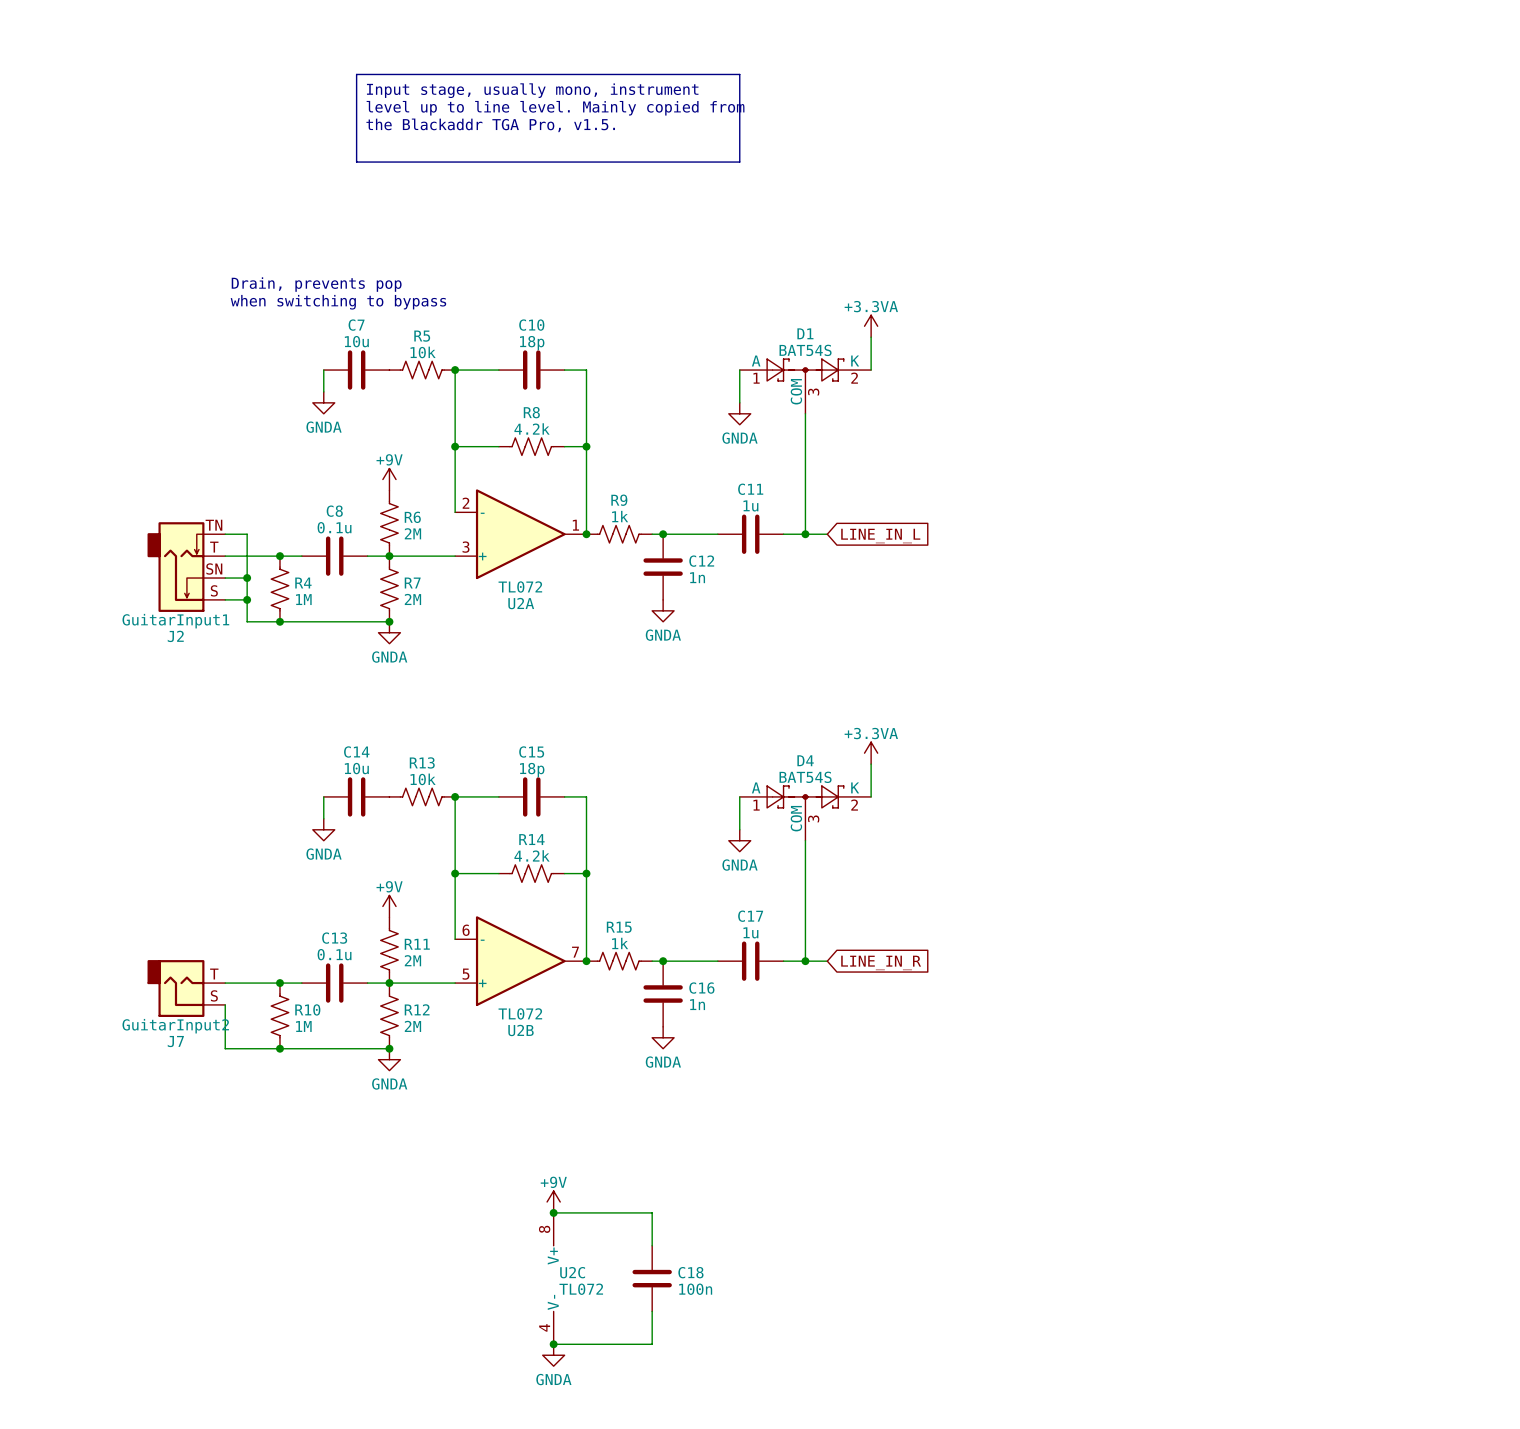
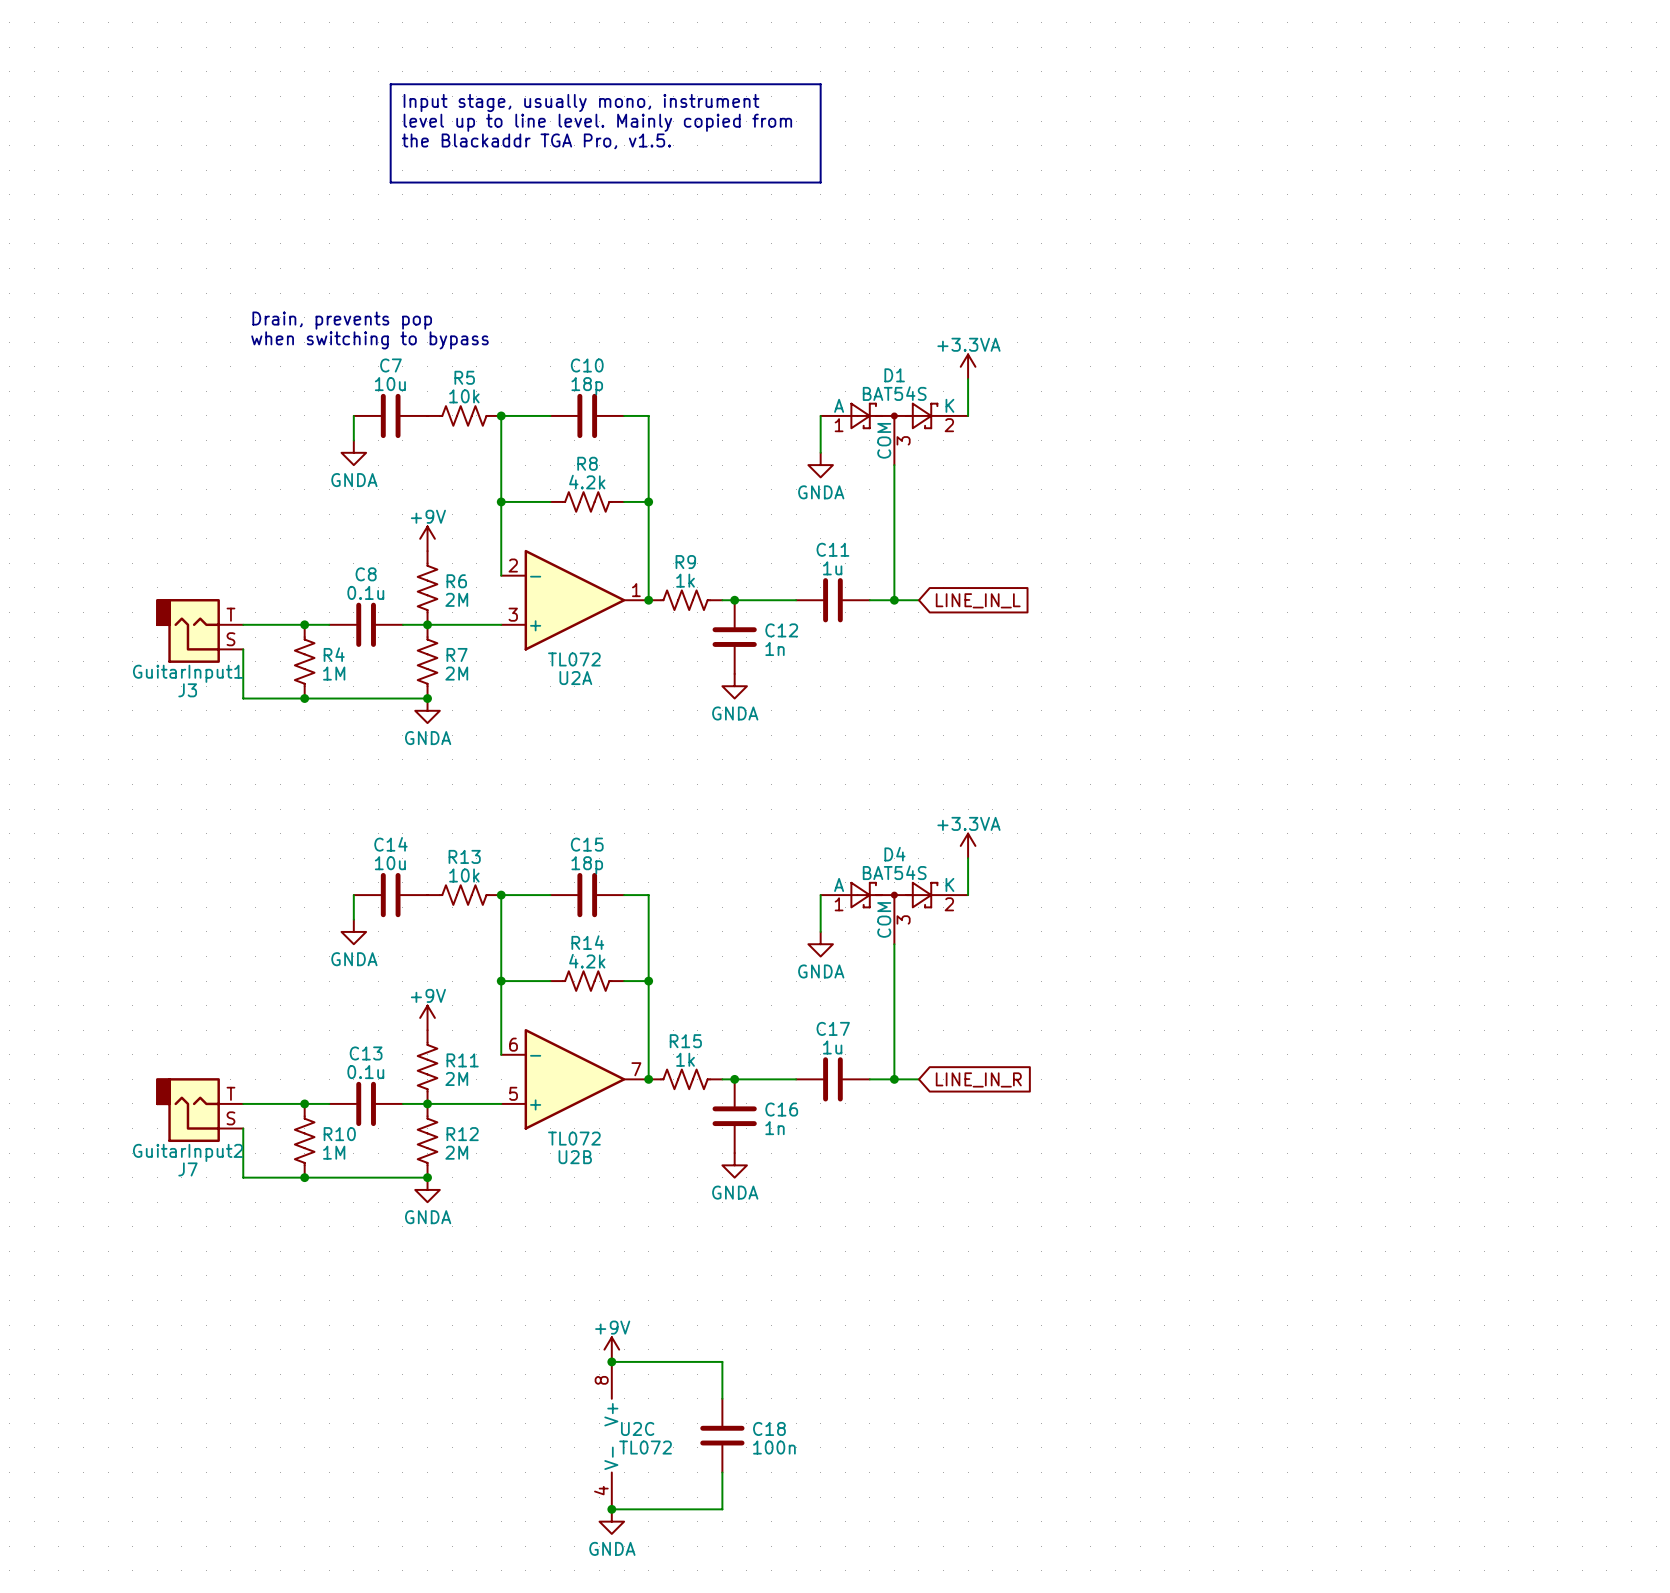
wire: (225, 534) (247, 534) (247, 621) -> (243, 649) (243, 698) (267, 698)
J3: none -> GuitarInput1 (199, 630)
J2: GuitarInput1 (186, 567) -> none
wire: (225, 578) (247, 578) -> none
junction: (247, 578) -> none
wire: (225, 599) (247, 599) -> none
junction: (247, 599) -> none

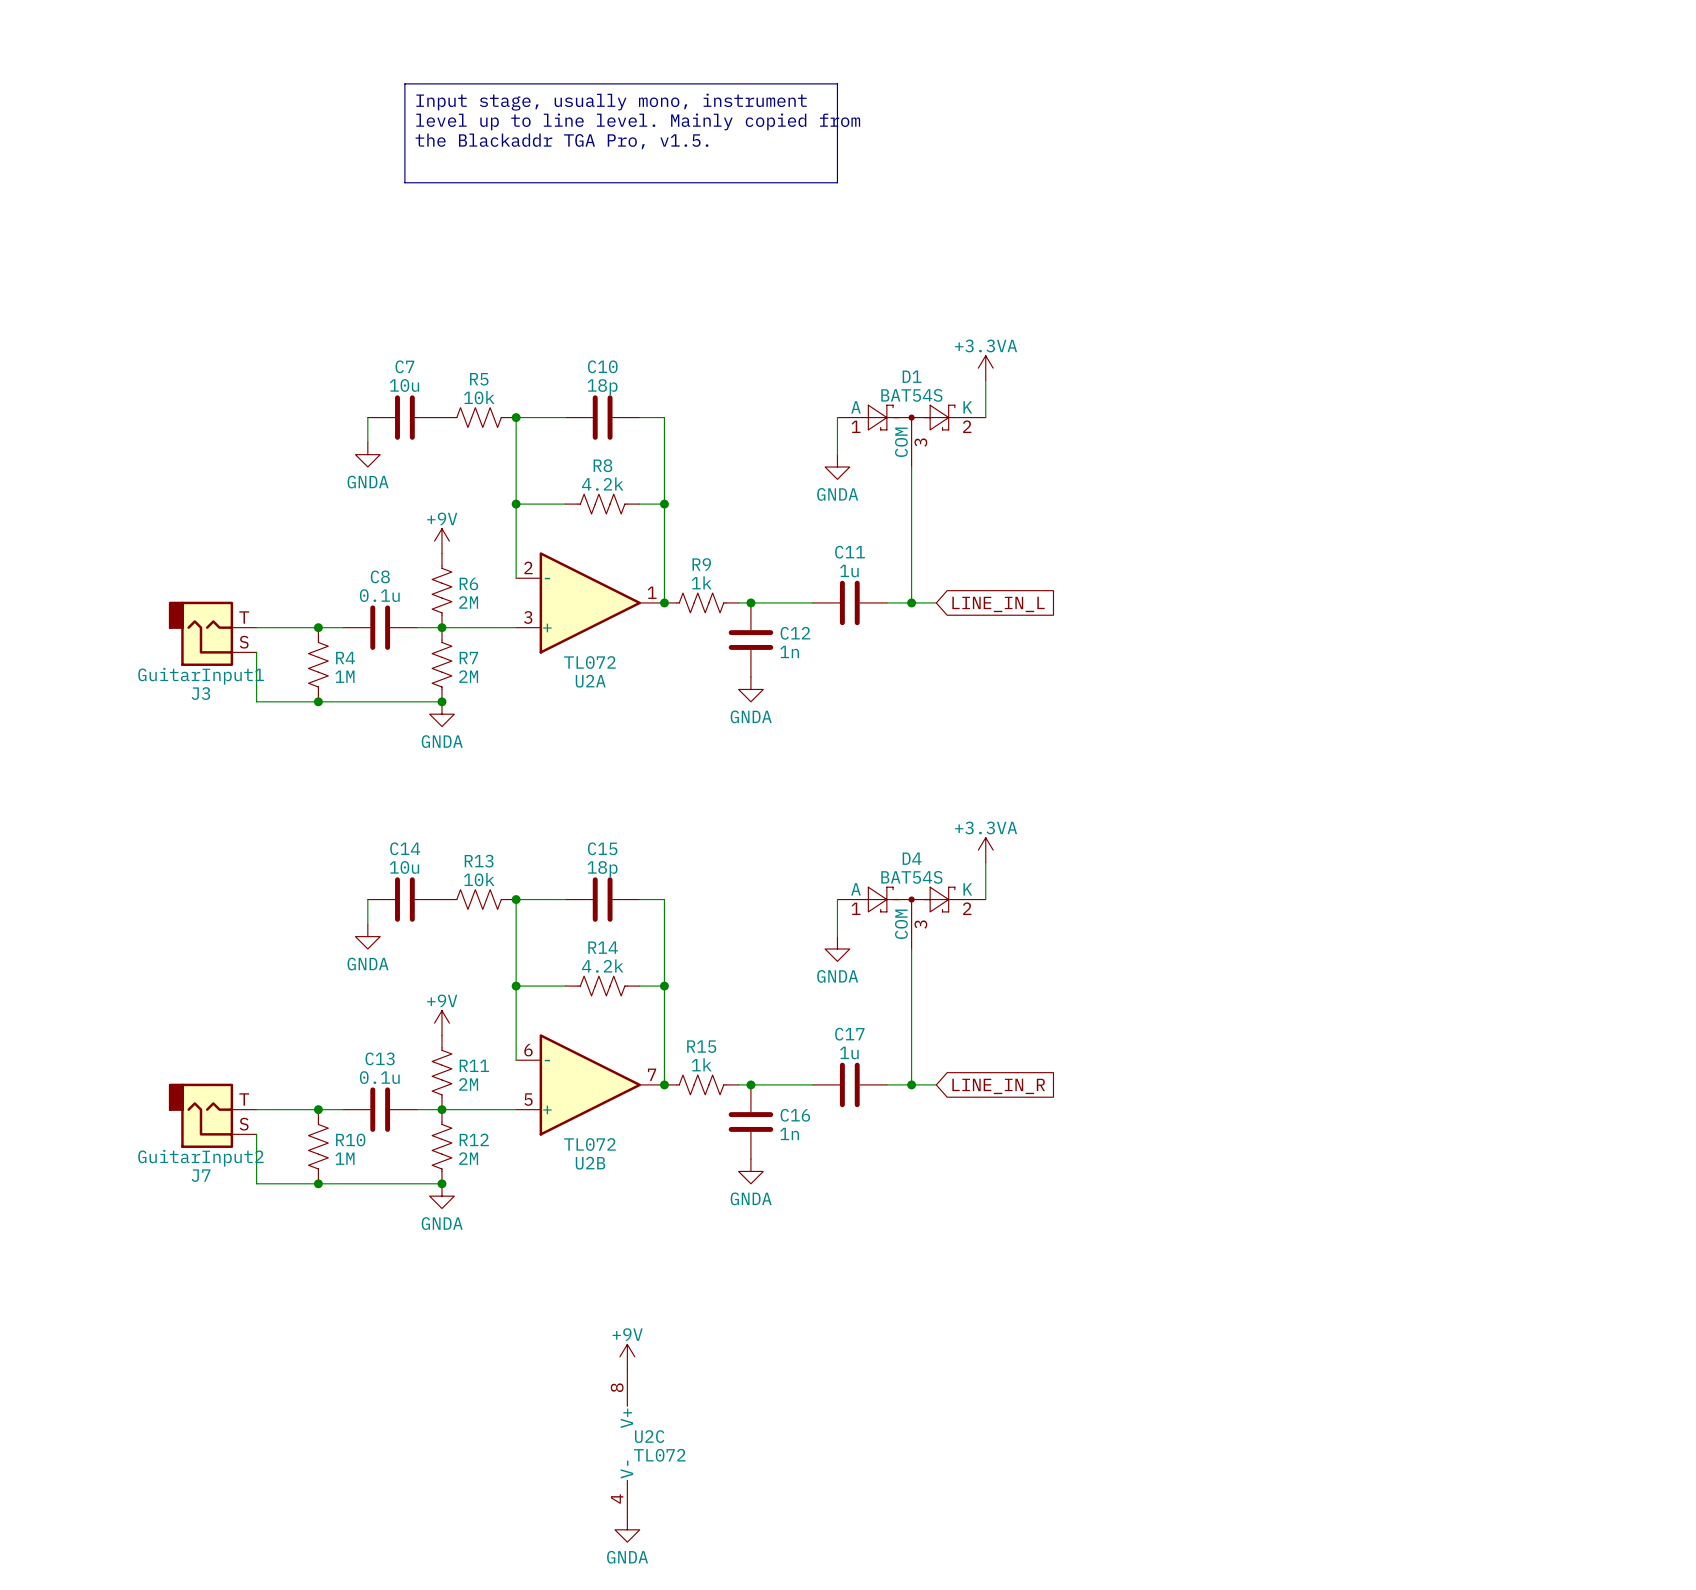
text: Drain, prevents pop (342, 320) -> none
text: when switching to bypass (370, 340) -> none
wire: (611, 1361) (722, 1361) (722, 1398) -> none
junction: (611, 1361) -> none
C18: 100n (722, 1435) -> none
wire: (722, 1472) (722, 1509) (611, 1509) -> none
junction: (611, 1509) -> none

